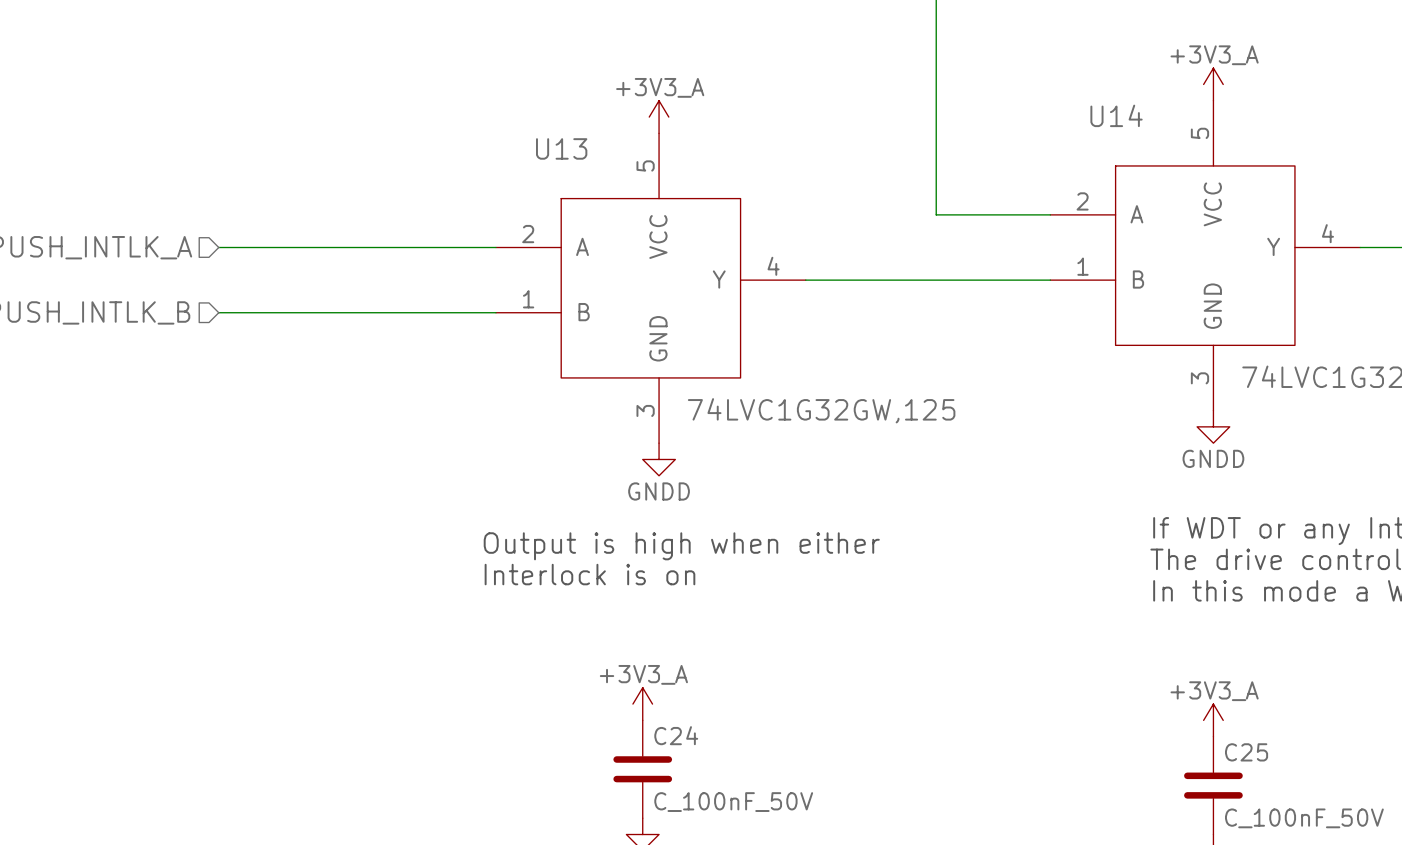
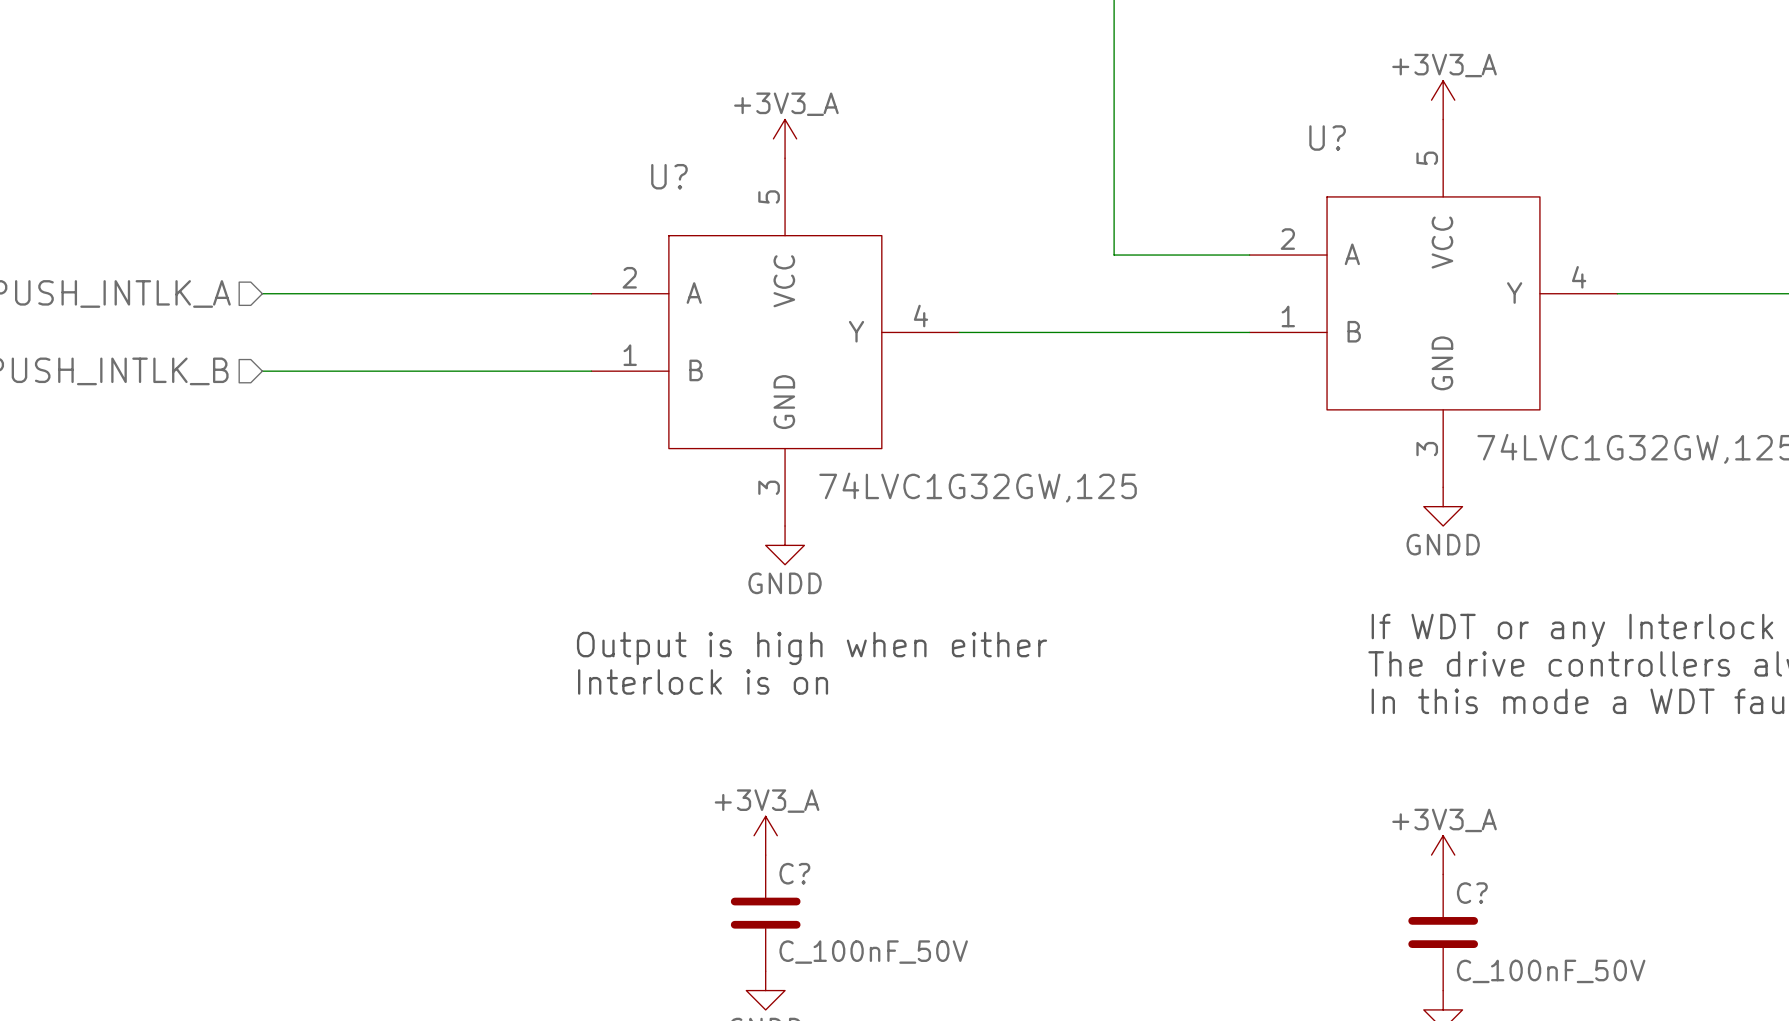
U14 name: U14 (1116, 115) -> U? (1327, 138)
U13 name: U13 (561, 148) -> U? (669, 176)
C24 name: C24 (676, 735) -> C? (794, 873)
C25 name: C25 (1246, 752) -> C? (1472, 893)

